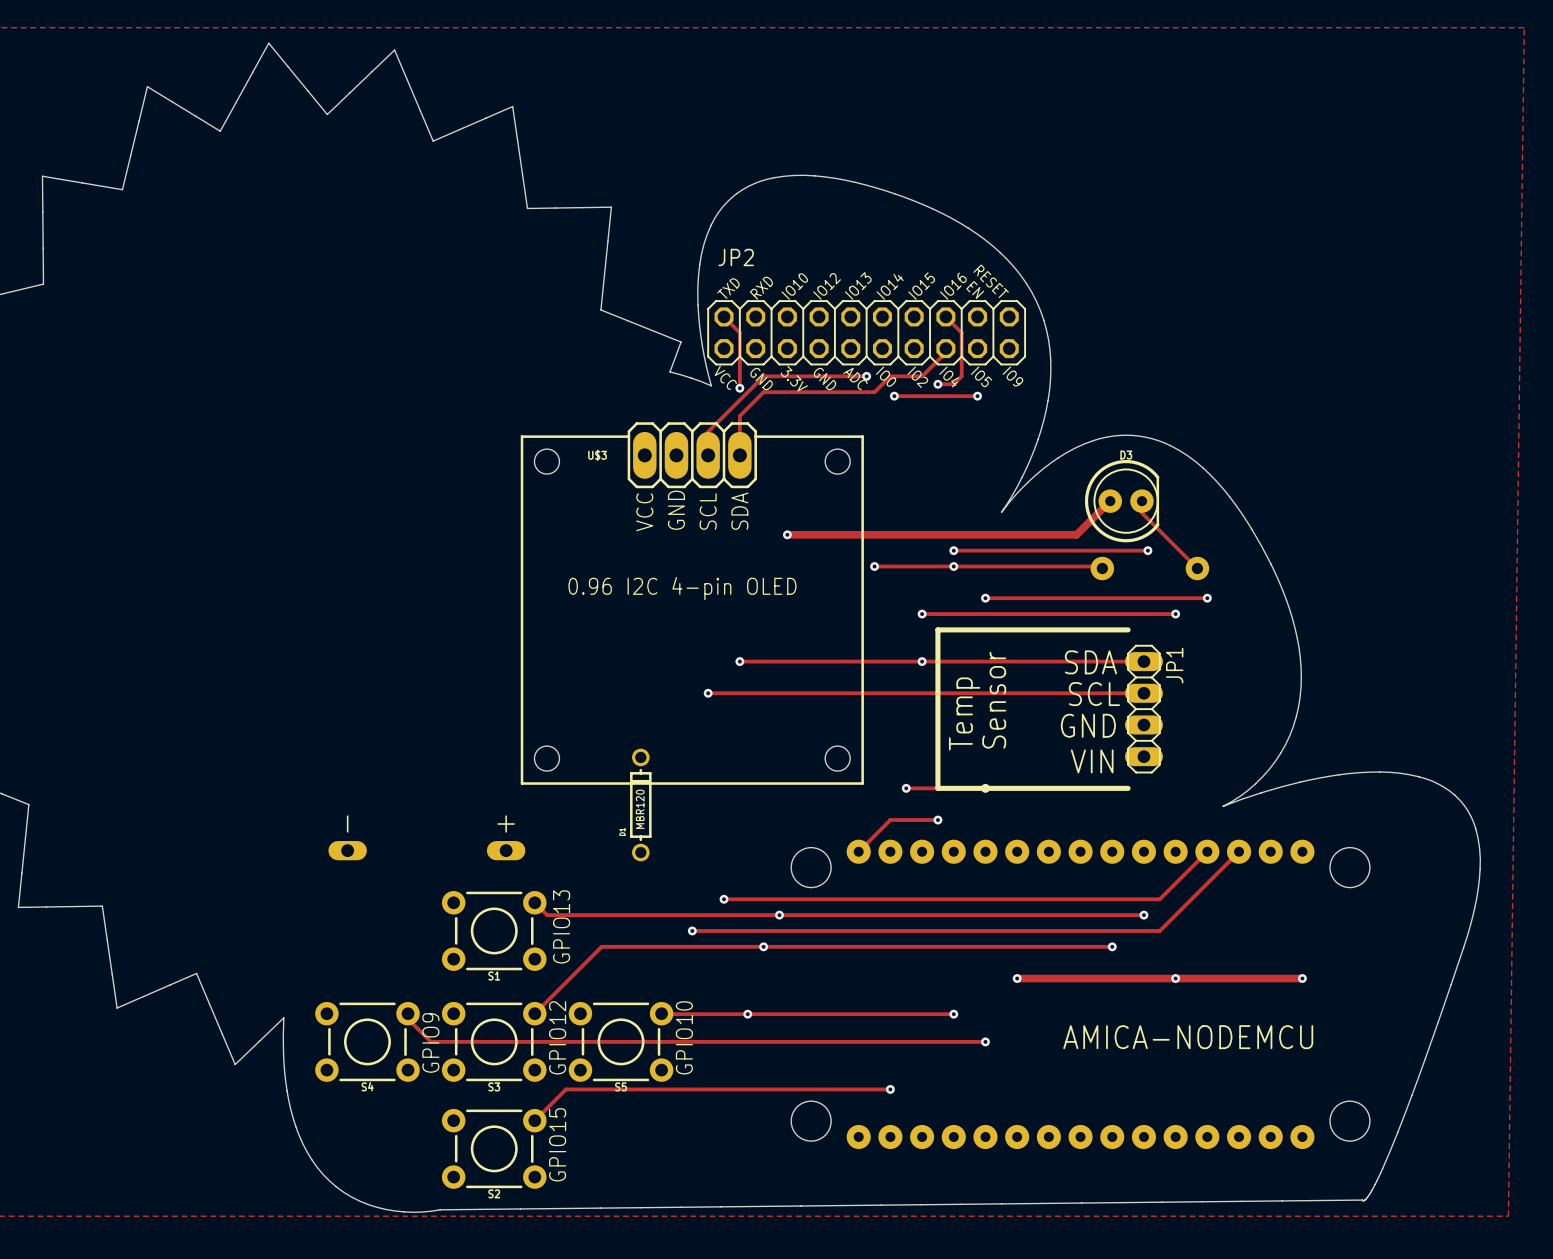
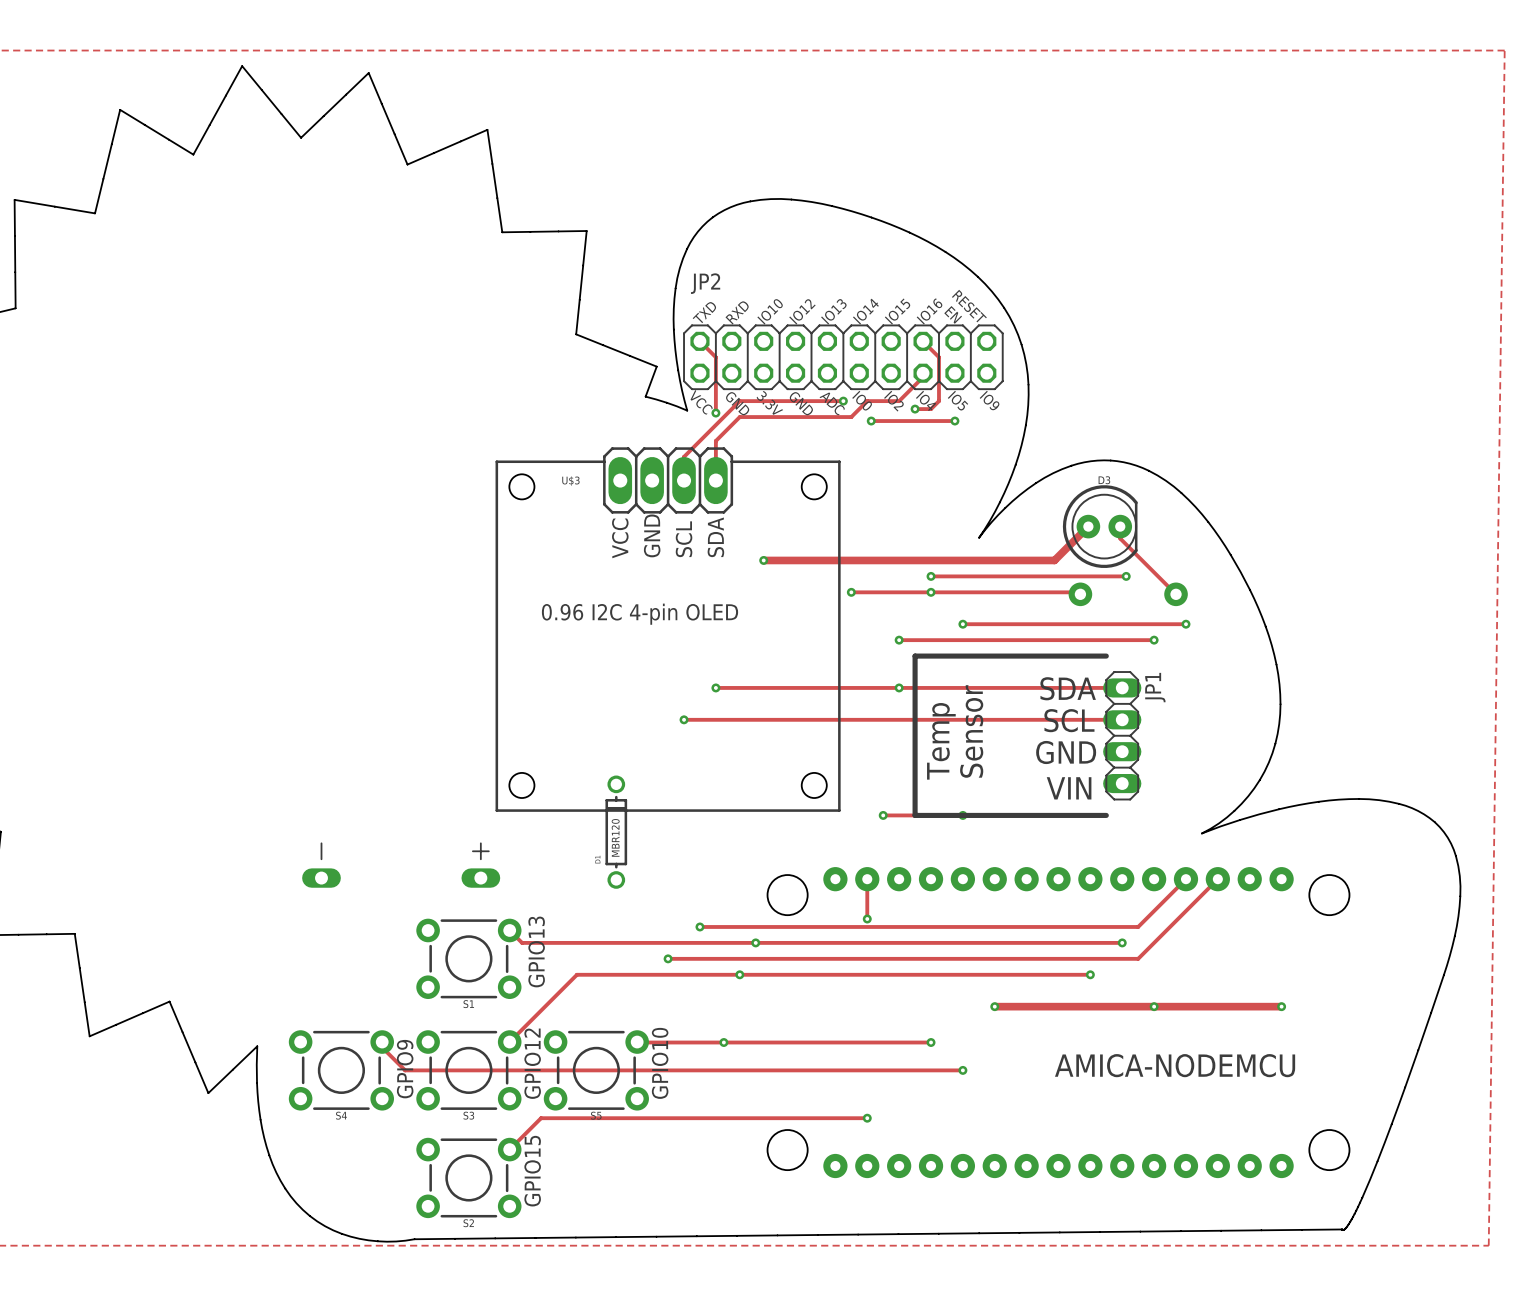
track: (937, 820) (890, 820) (858, 851) -> none
via: (937, 820) -> none
track: none -> (867, 879) (867, 919)
via: none -> (867, 919)

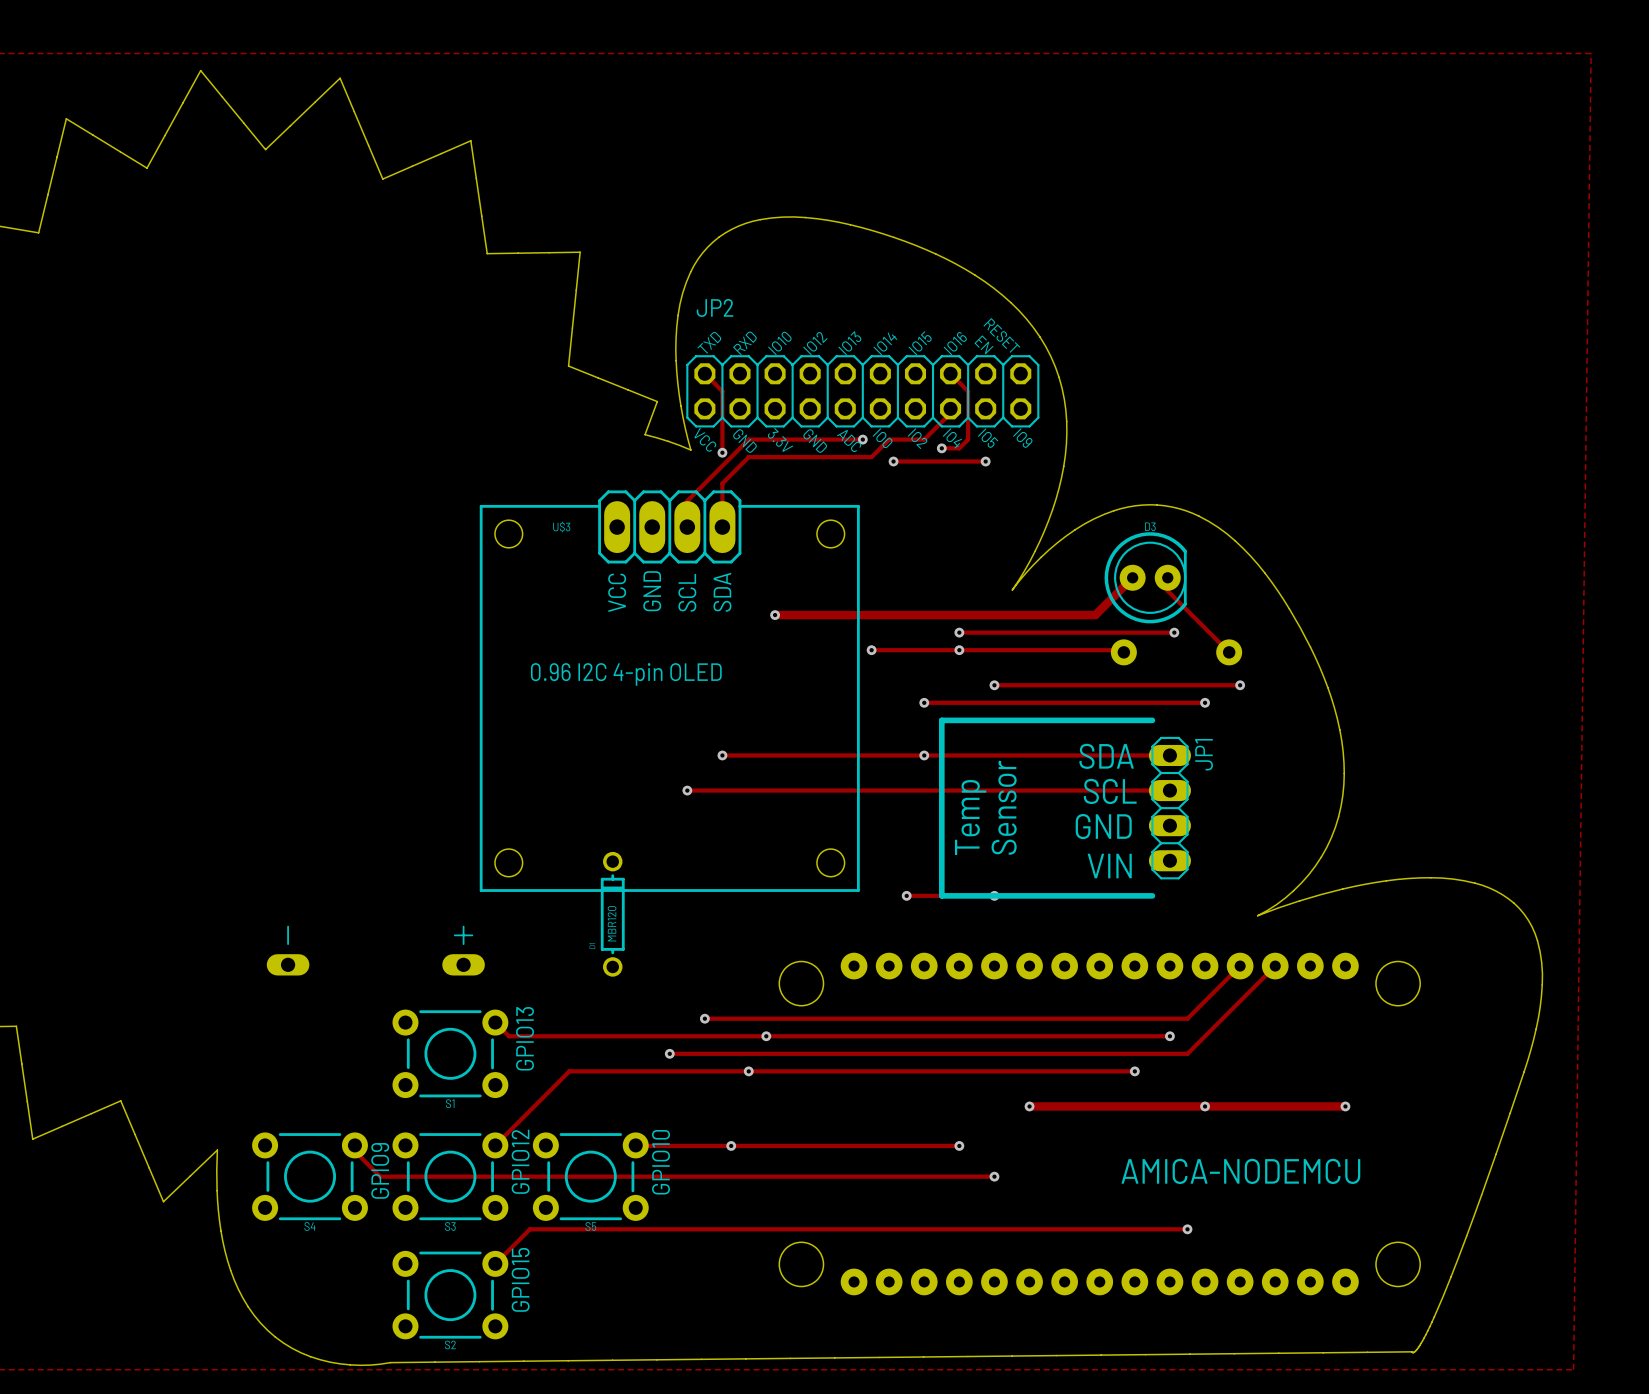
track: (867, 879) (867, 919) -> none
via: (867, 919) -> none
track: none -> (889, 1229) (1187, 1229)
via: (867, 1118) -> none
via: none -> (1187, 1229)

